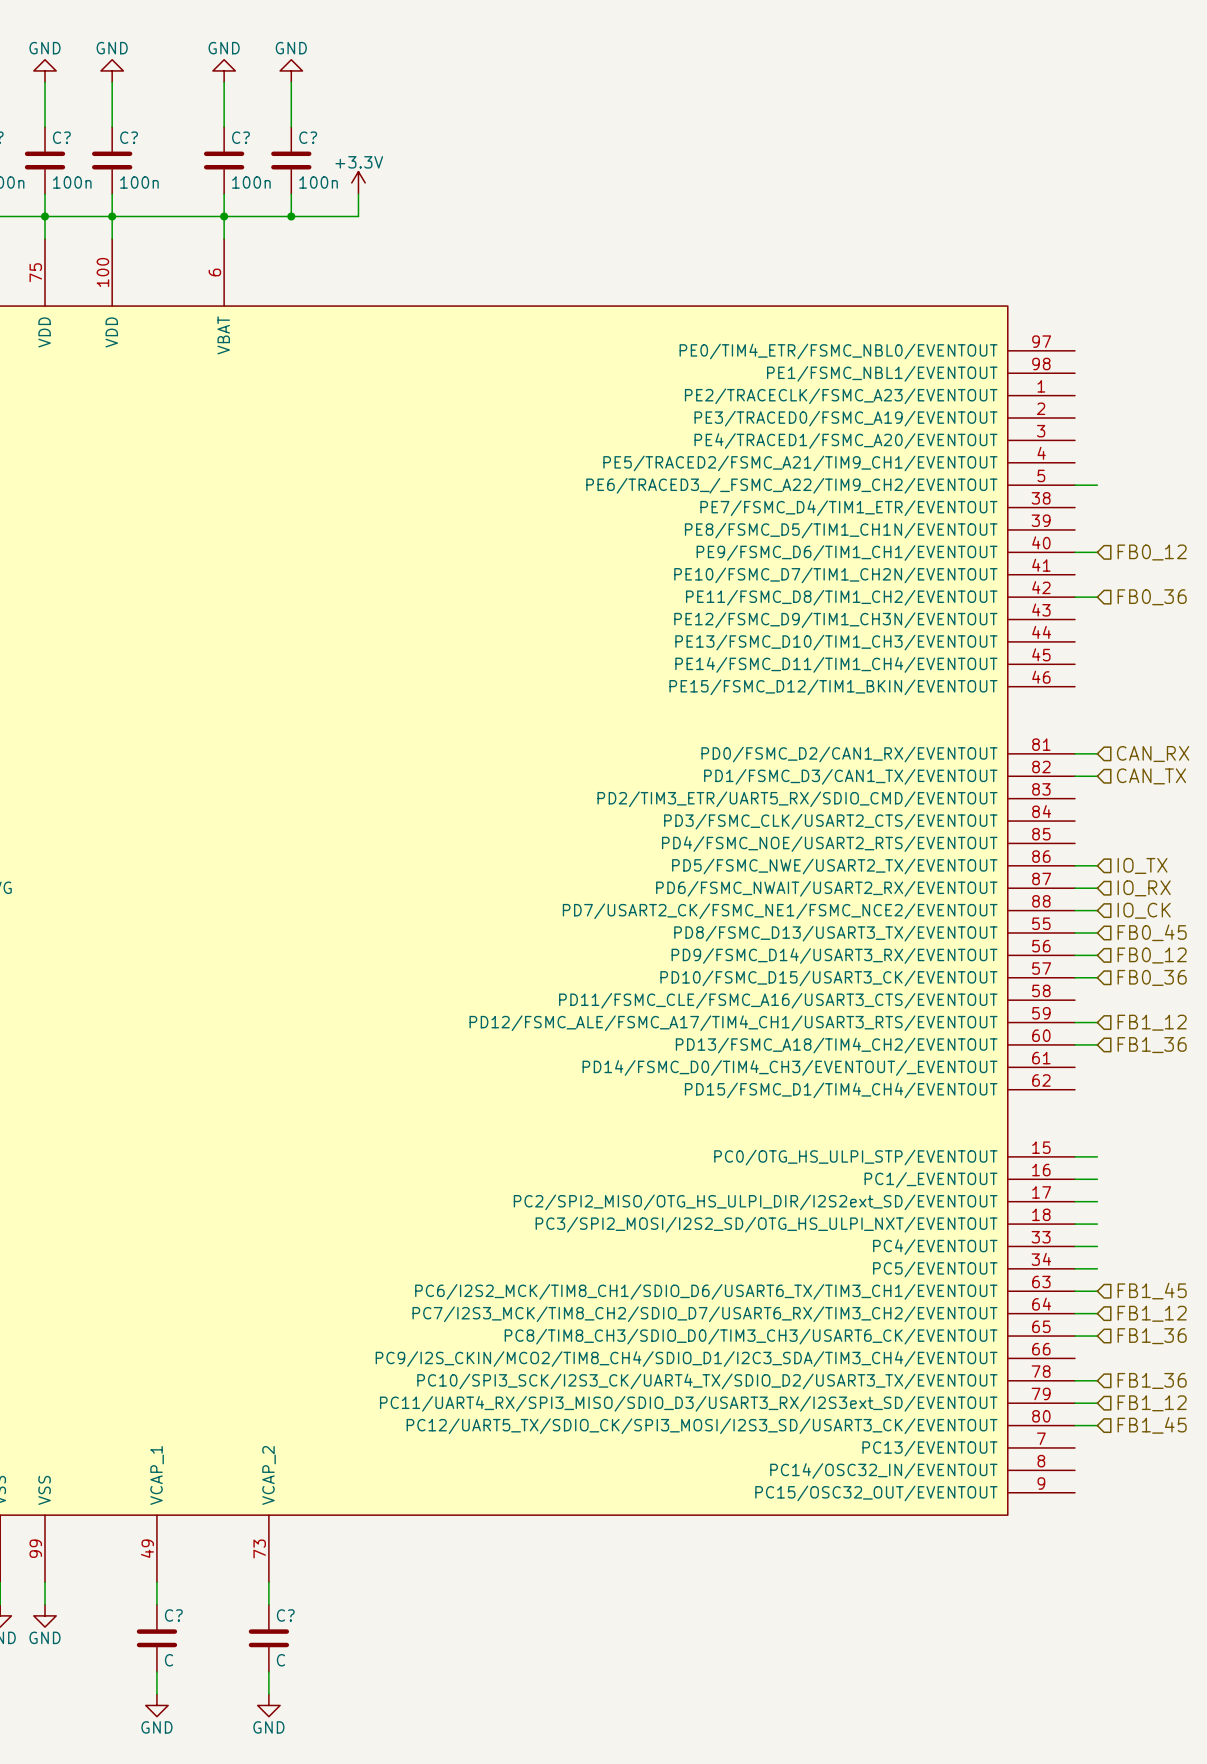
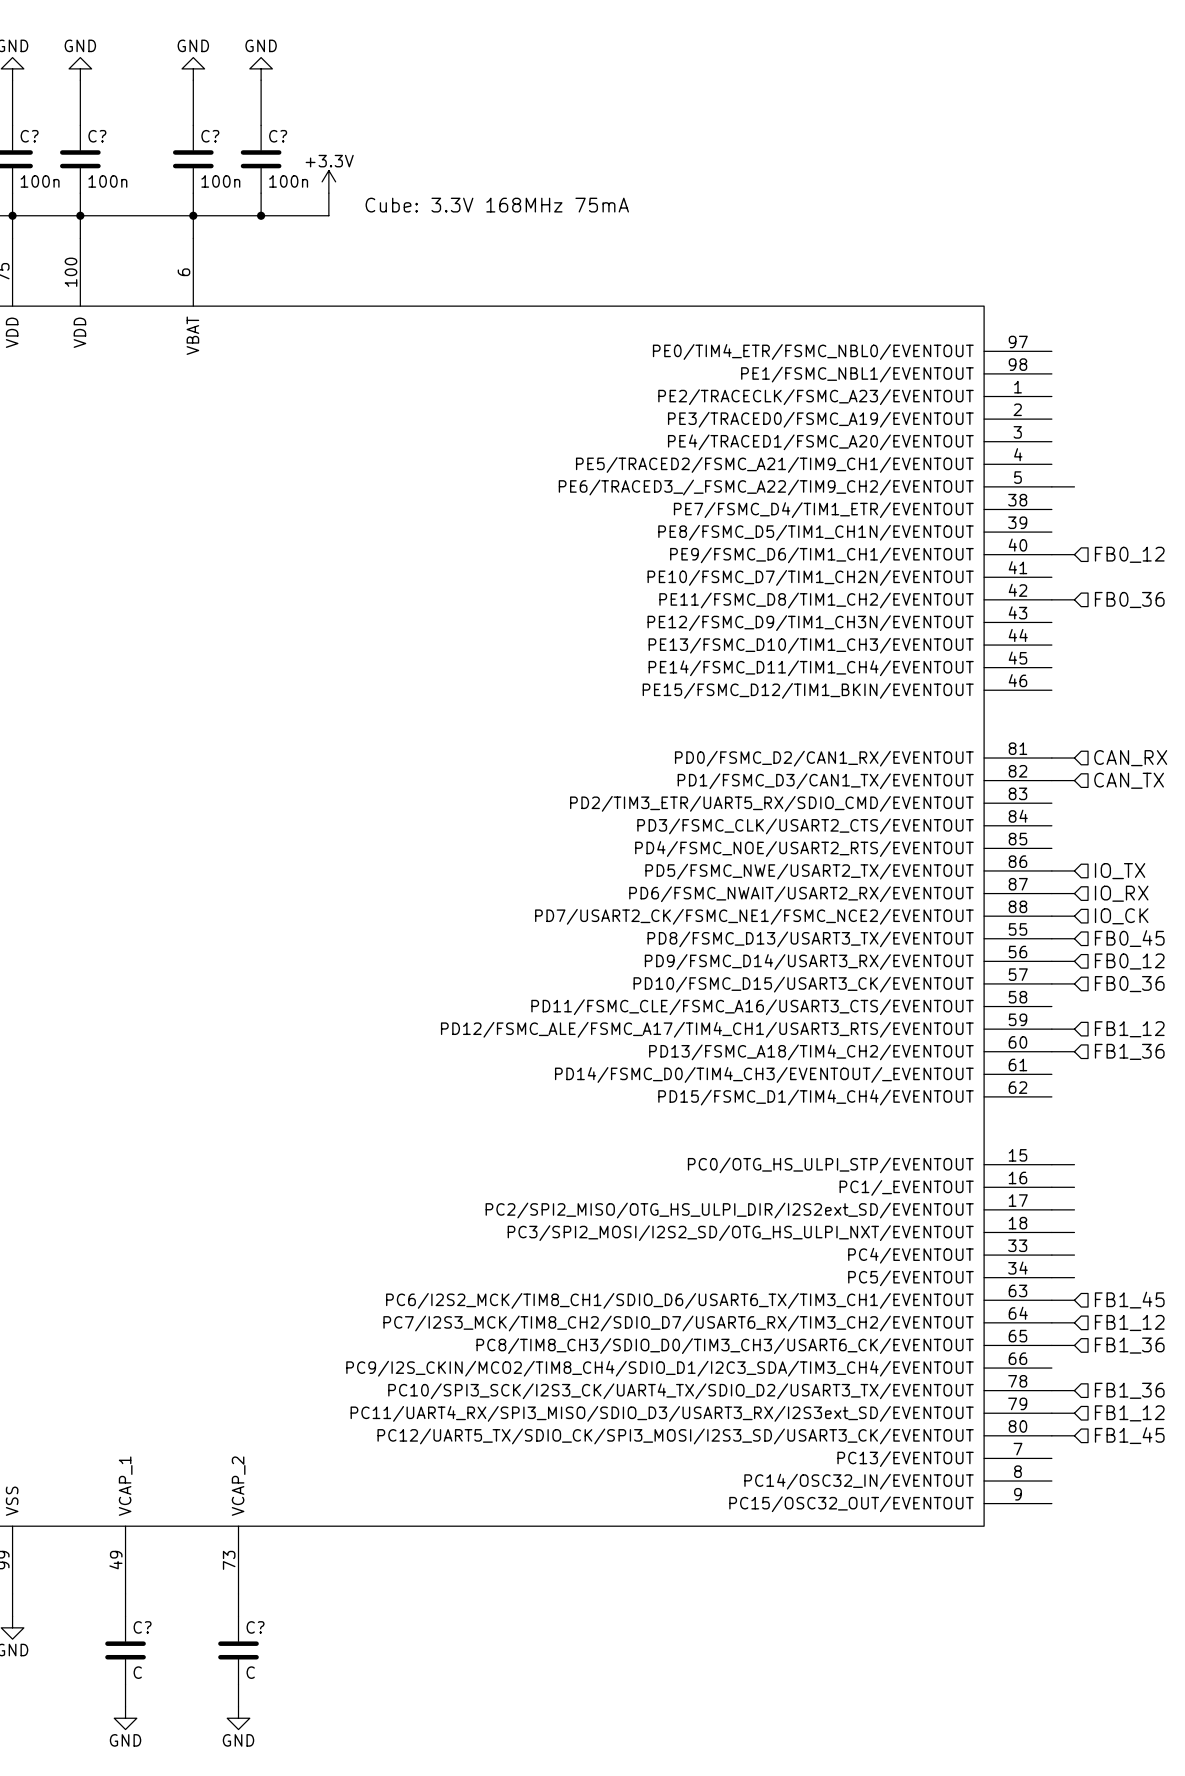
text: none -> Cube: 3.3V 168MHz 75mA (497, 205)

